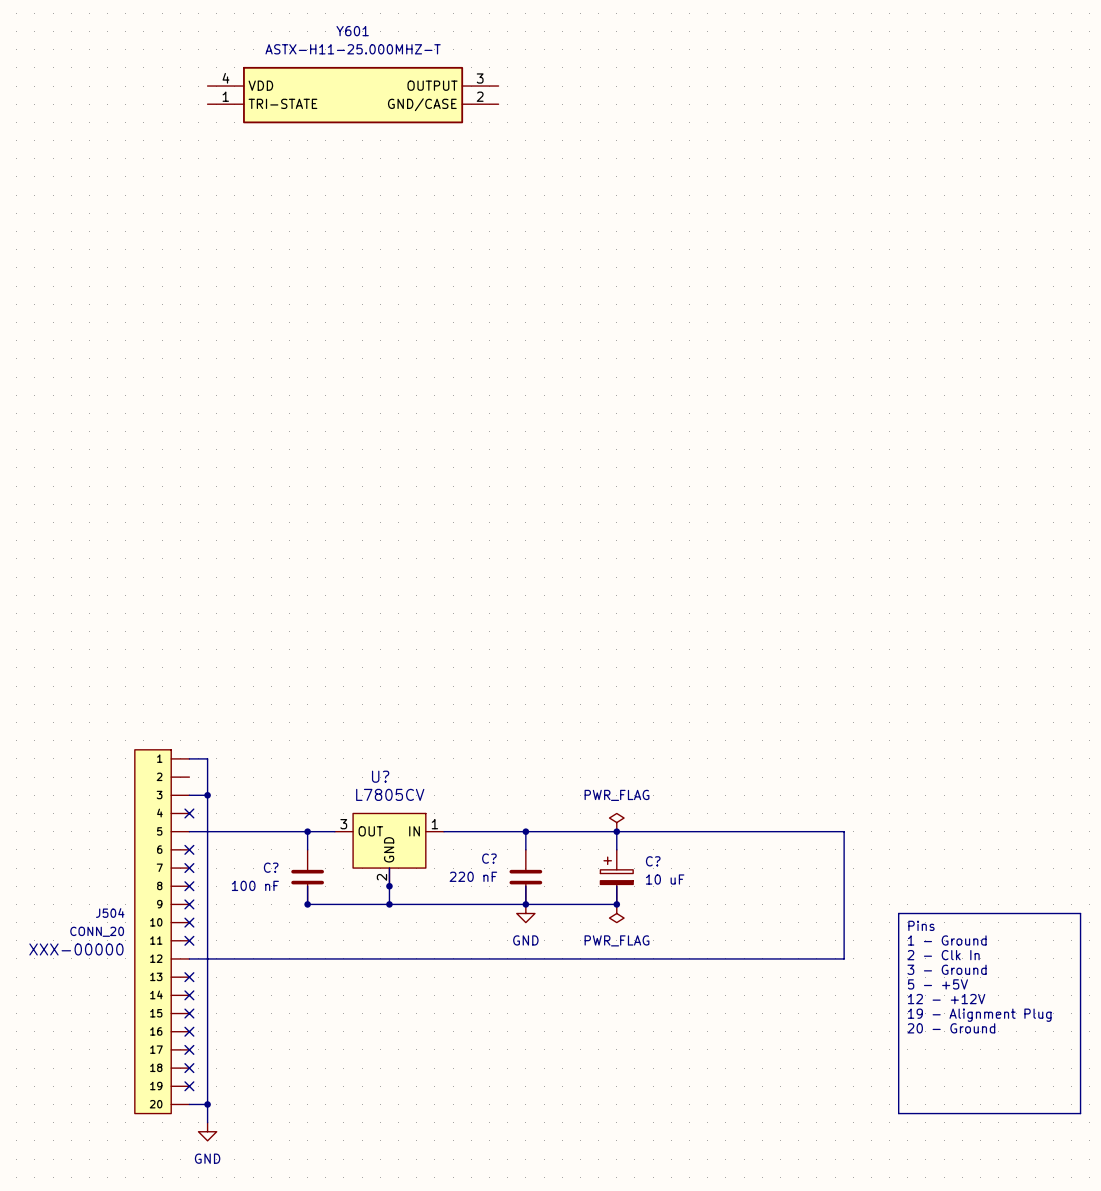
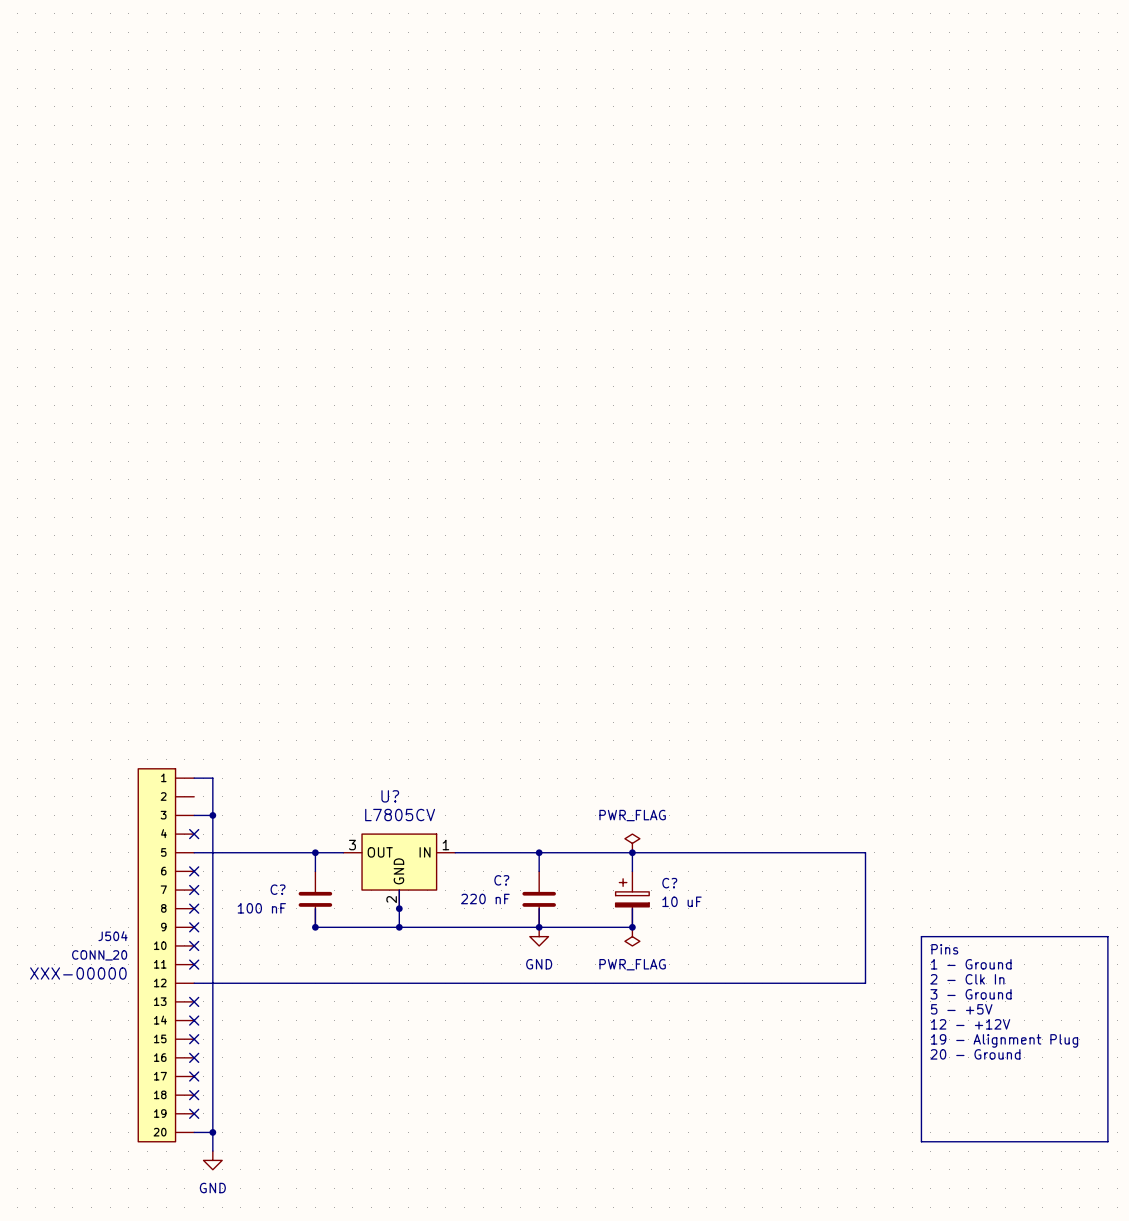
Y601: ASTX-H11-25.000MHZ-T (353, 95) -> none

